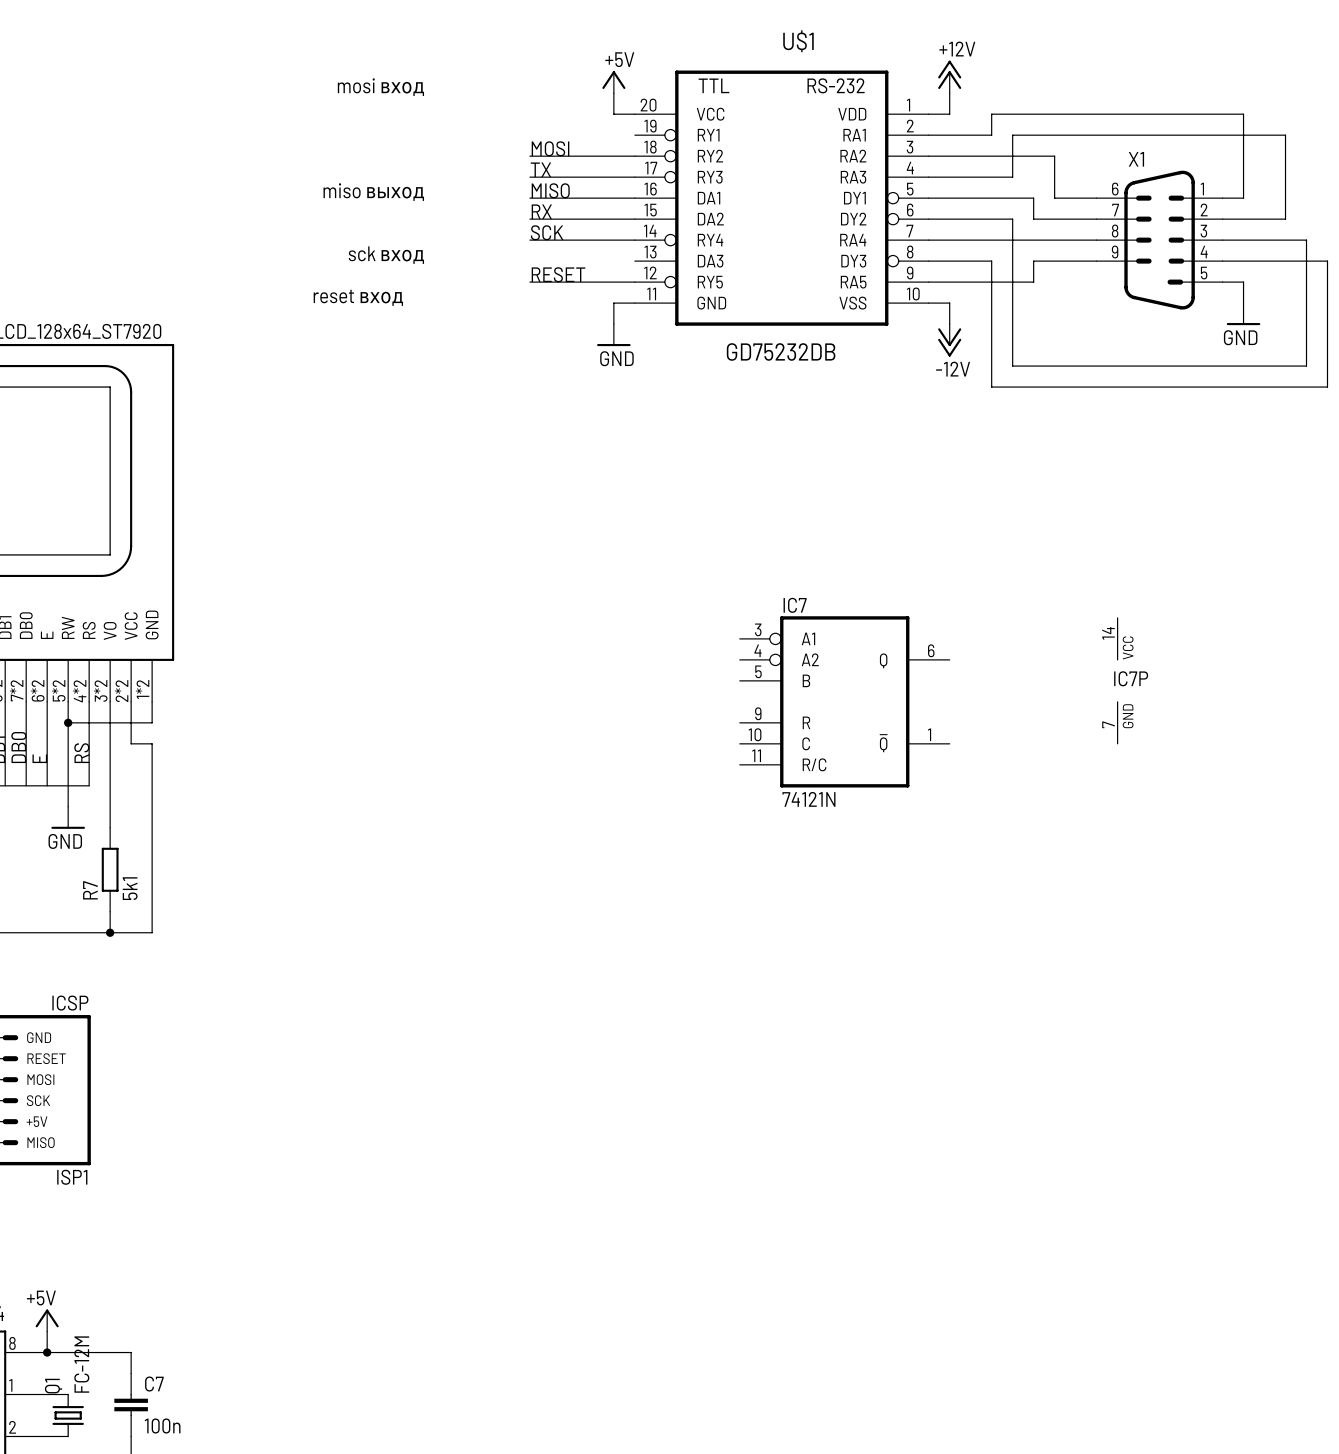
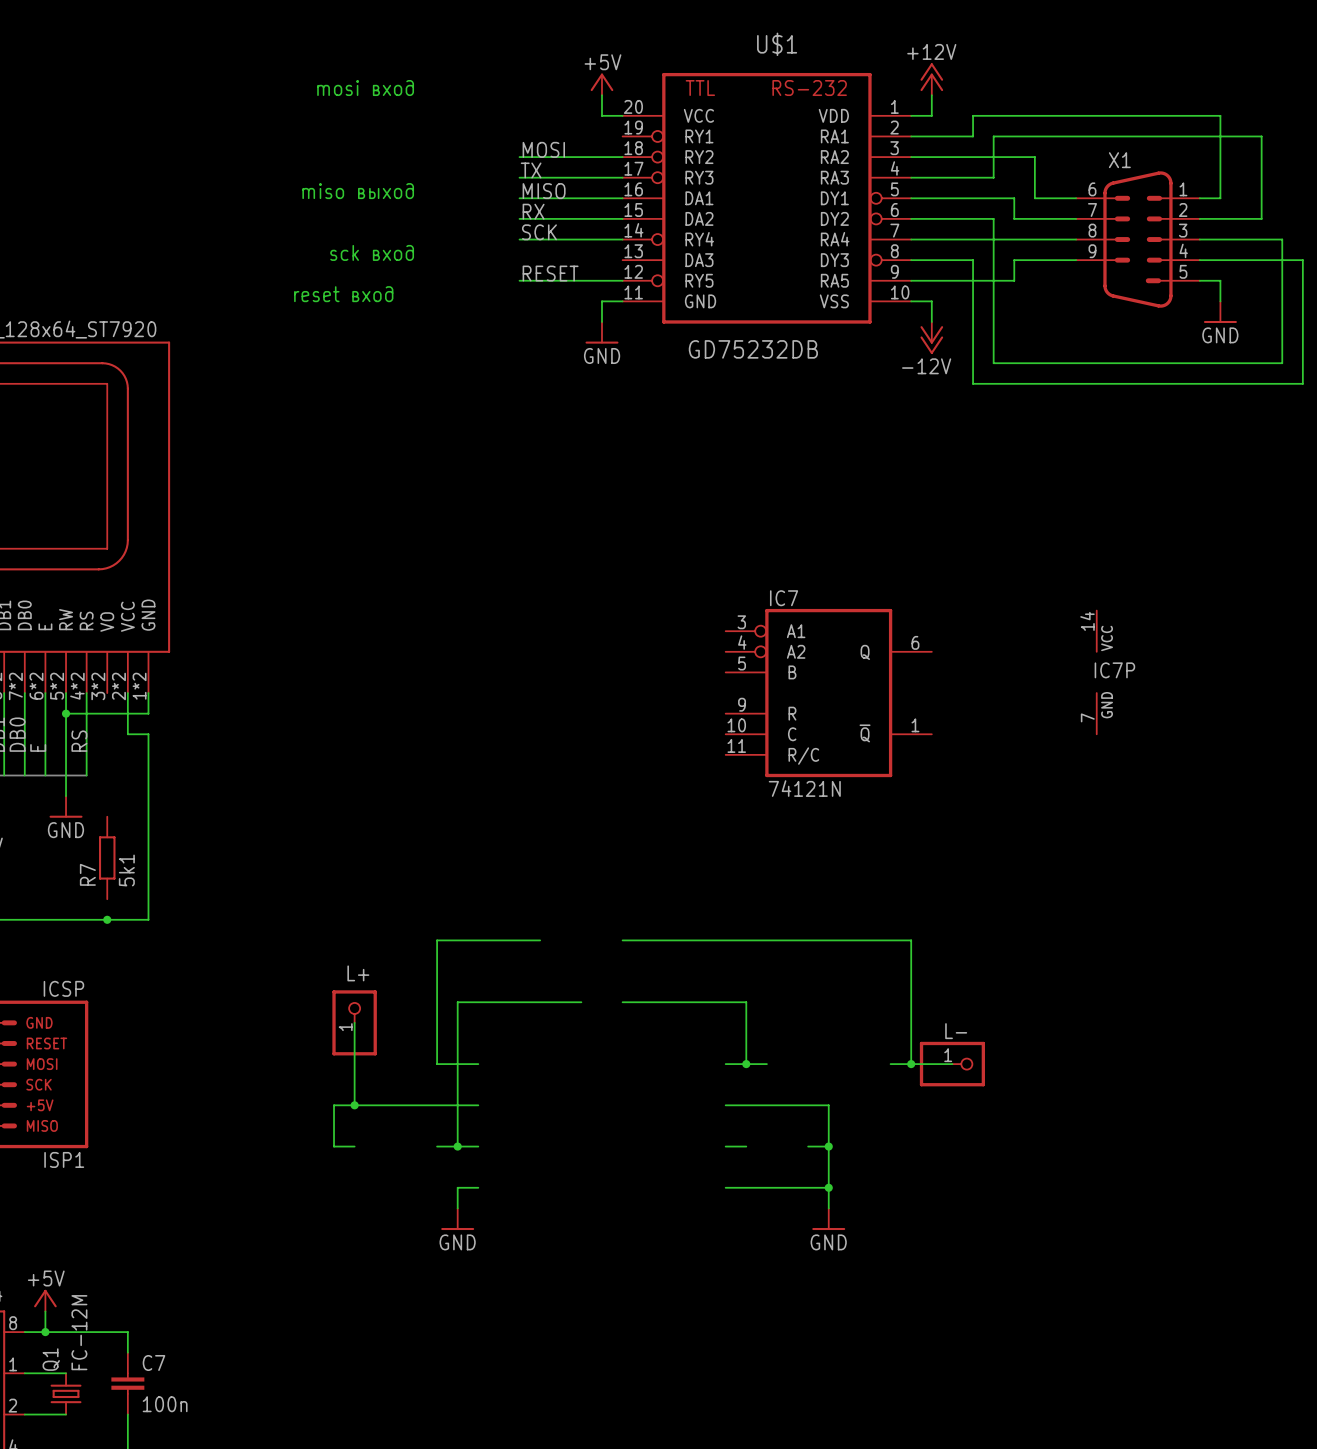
wire: (110, 701) (110, 827) -> none
wire: (110, 911) (110, 932) -> none
wire: none -> (540, 940) (437, 940) (437, 1064) (478, 1064)
wire: none -> (622, 940) (911, 940) (911, 1064)
wire: none -> (581, 1002) (457, 1002) (457, 1146)
wire: none -> (622, 1002) (746, 1002) (746, 1064)
wire: none -> (354, 1022) (354, 1105)
L+: none -> (354, 1022)
wire: none -> (725, 1064) (766, 1064)
junction: none -> (746, 1064)
wire: none -> (890, 1064) (952, 1064)
junction: none -> (911, 1064)
L-: none -> (952, 1064)
junction: none -> (354, 1105)
wire: none -> (478, 1105) (334, 1105) (334, 1146) (354, 1146)
wire: none -> (725, 1105) (828, 1105) (828, 1208)
wire: none -> (437, 1146) (478, 1146)
junction: none -> (457, 1146)
wire: none -> (725, 1146) (746, 1146)
wire: none -> (808, 1146) (828, 1146)
junction: none -> (828, 1146)
wire: none -> (478, 1187) (457, 1187) (457, 1208)
wire: none -> (725, 1187) (828, 1187)
junction: none -> (828, 1187)
power symbol: none -> GND (457, 1219)
power symbol: none -> GND (828, 1219)

